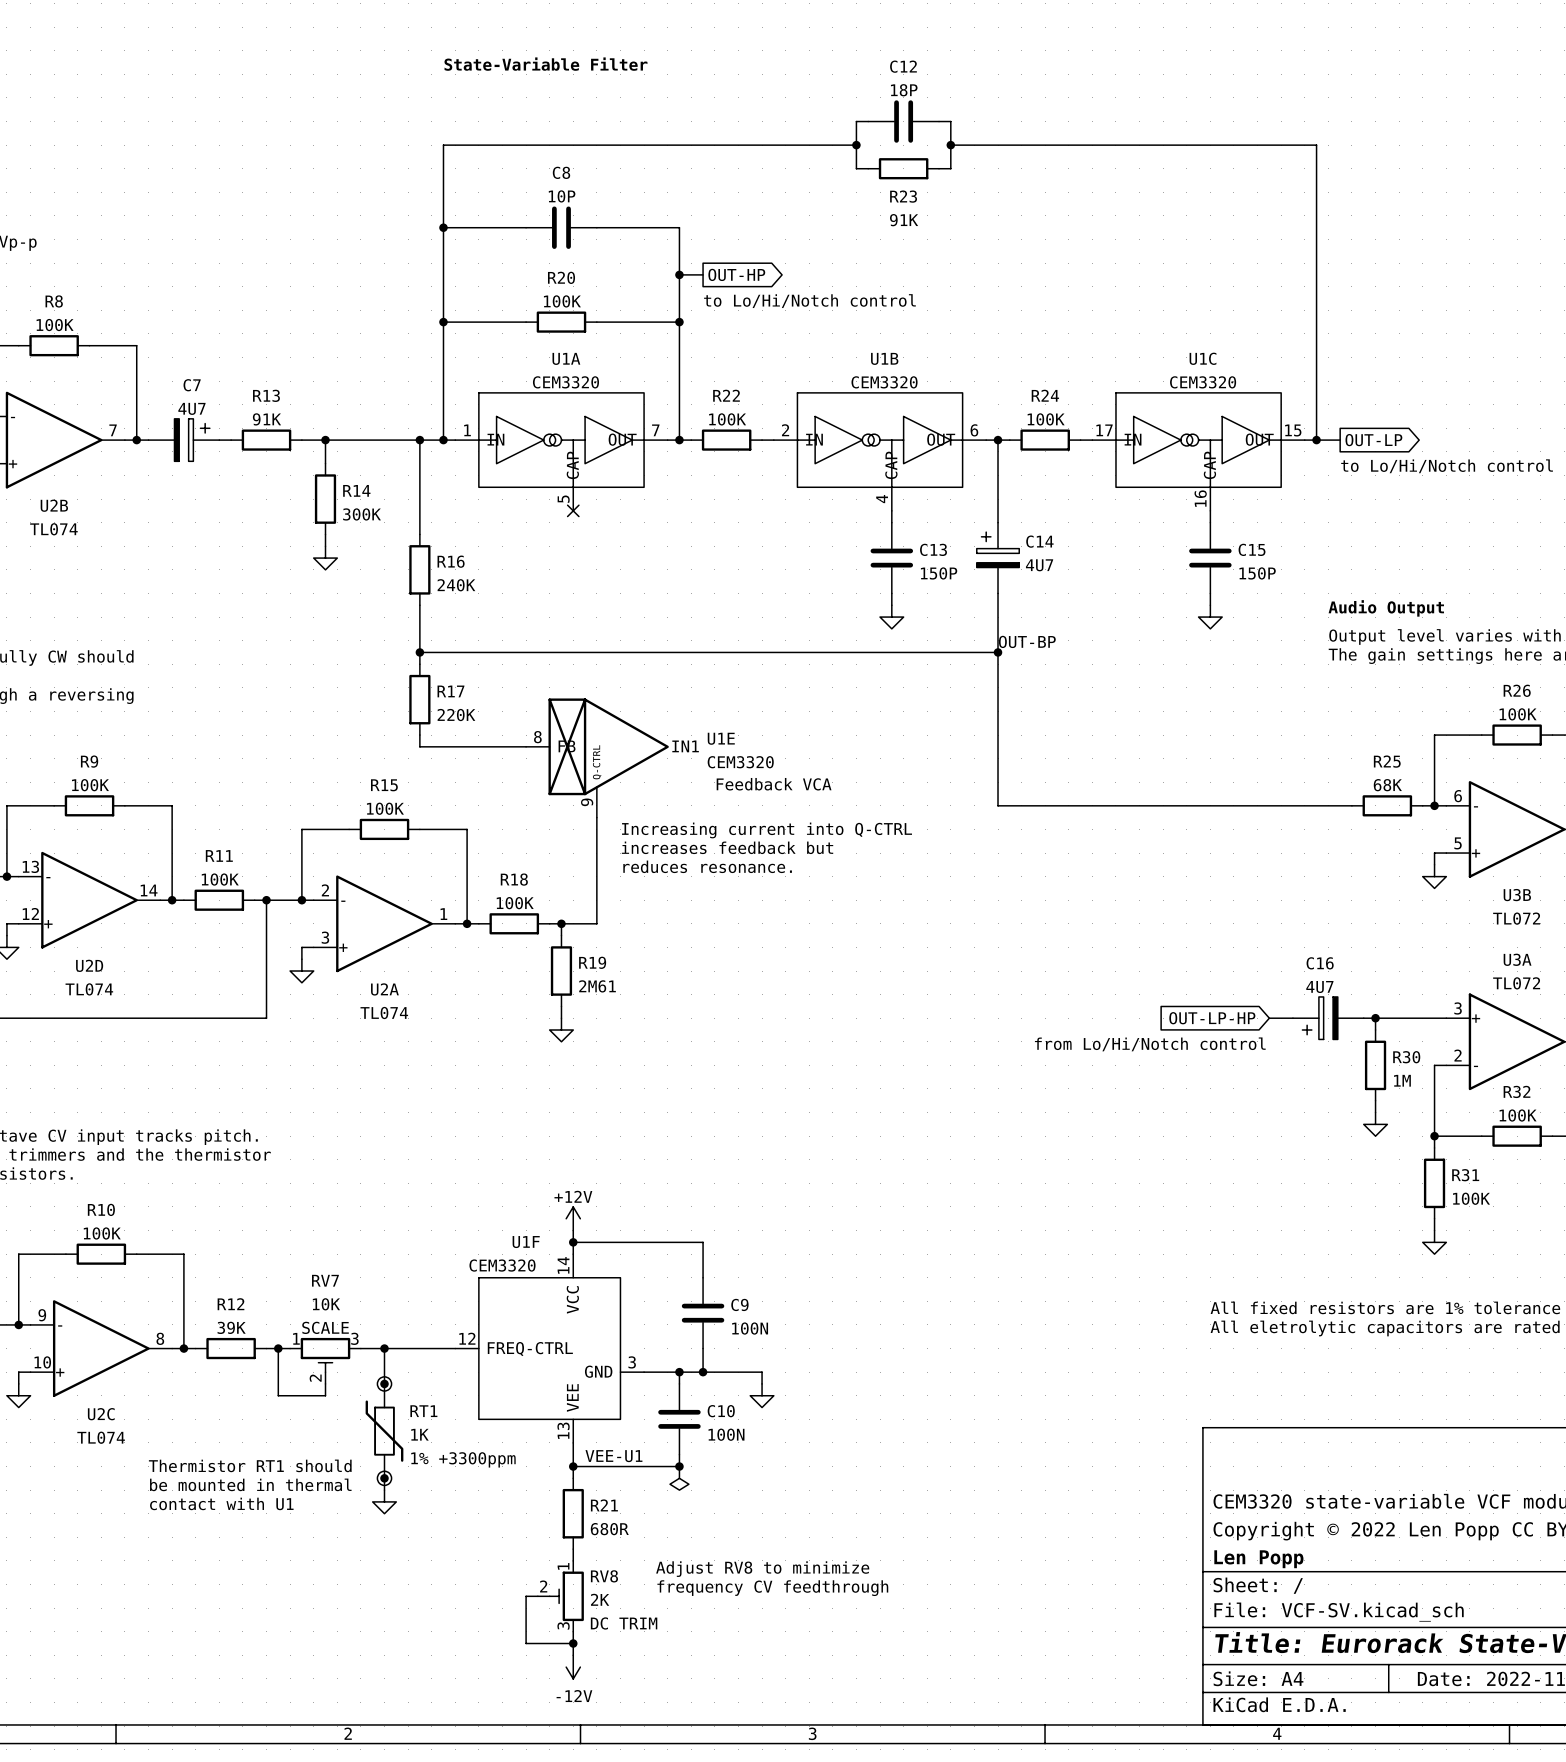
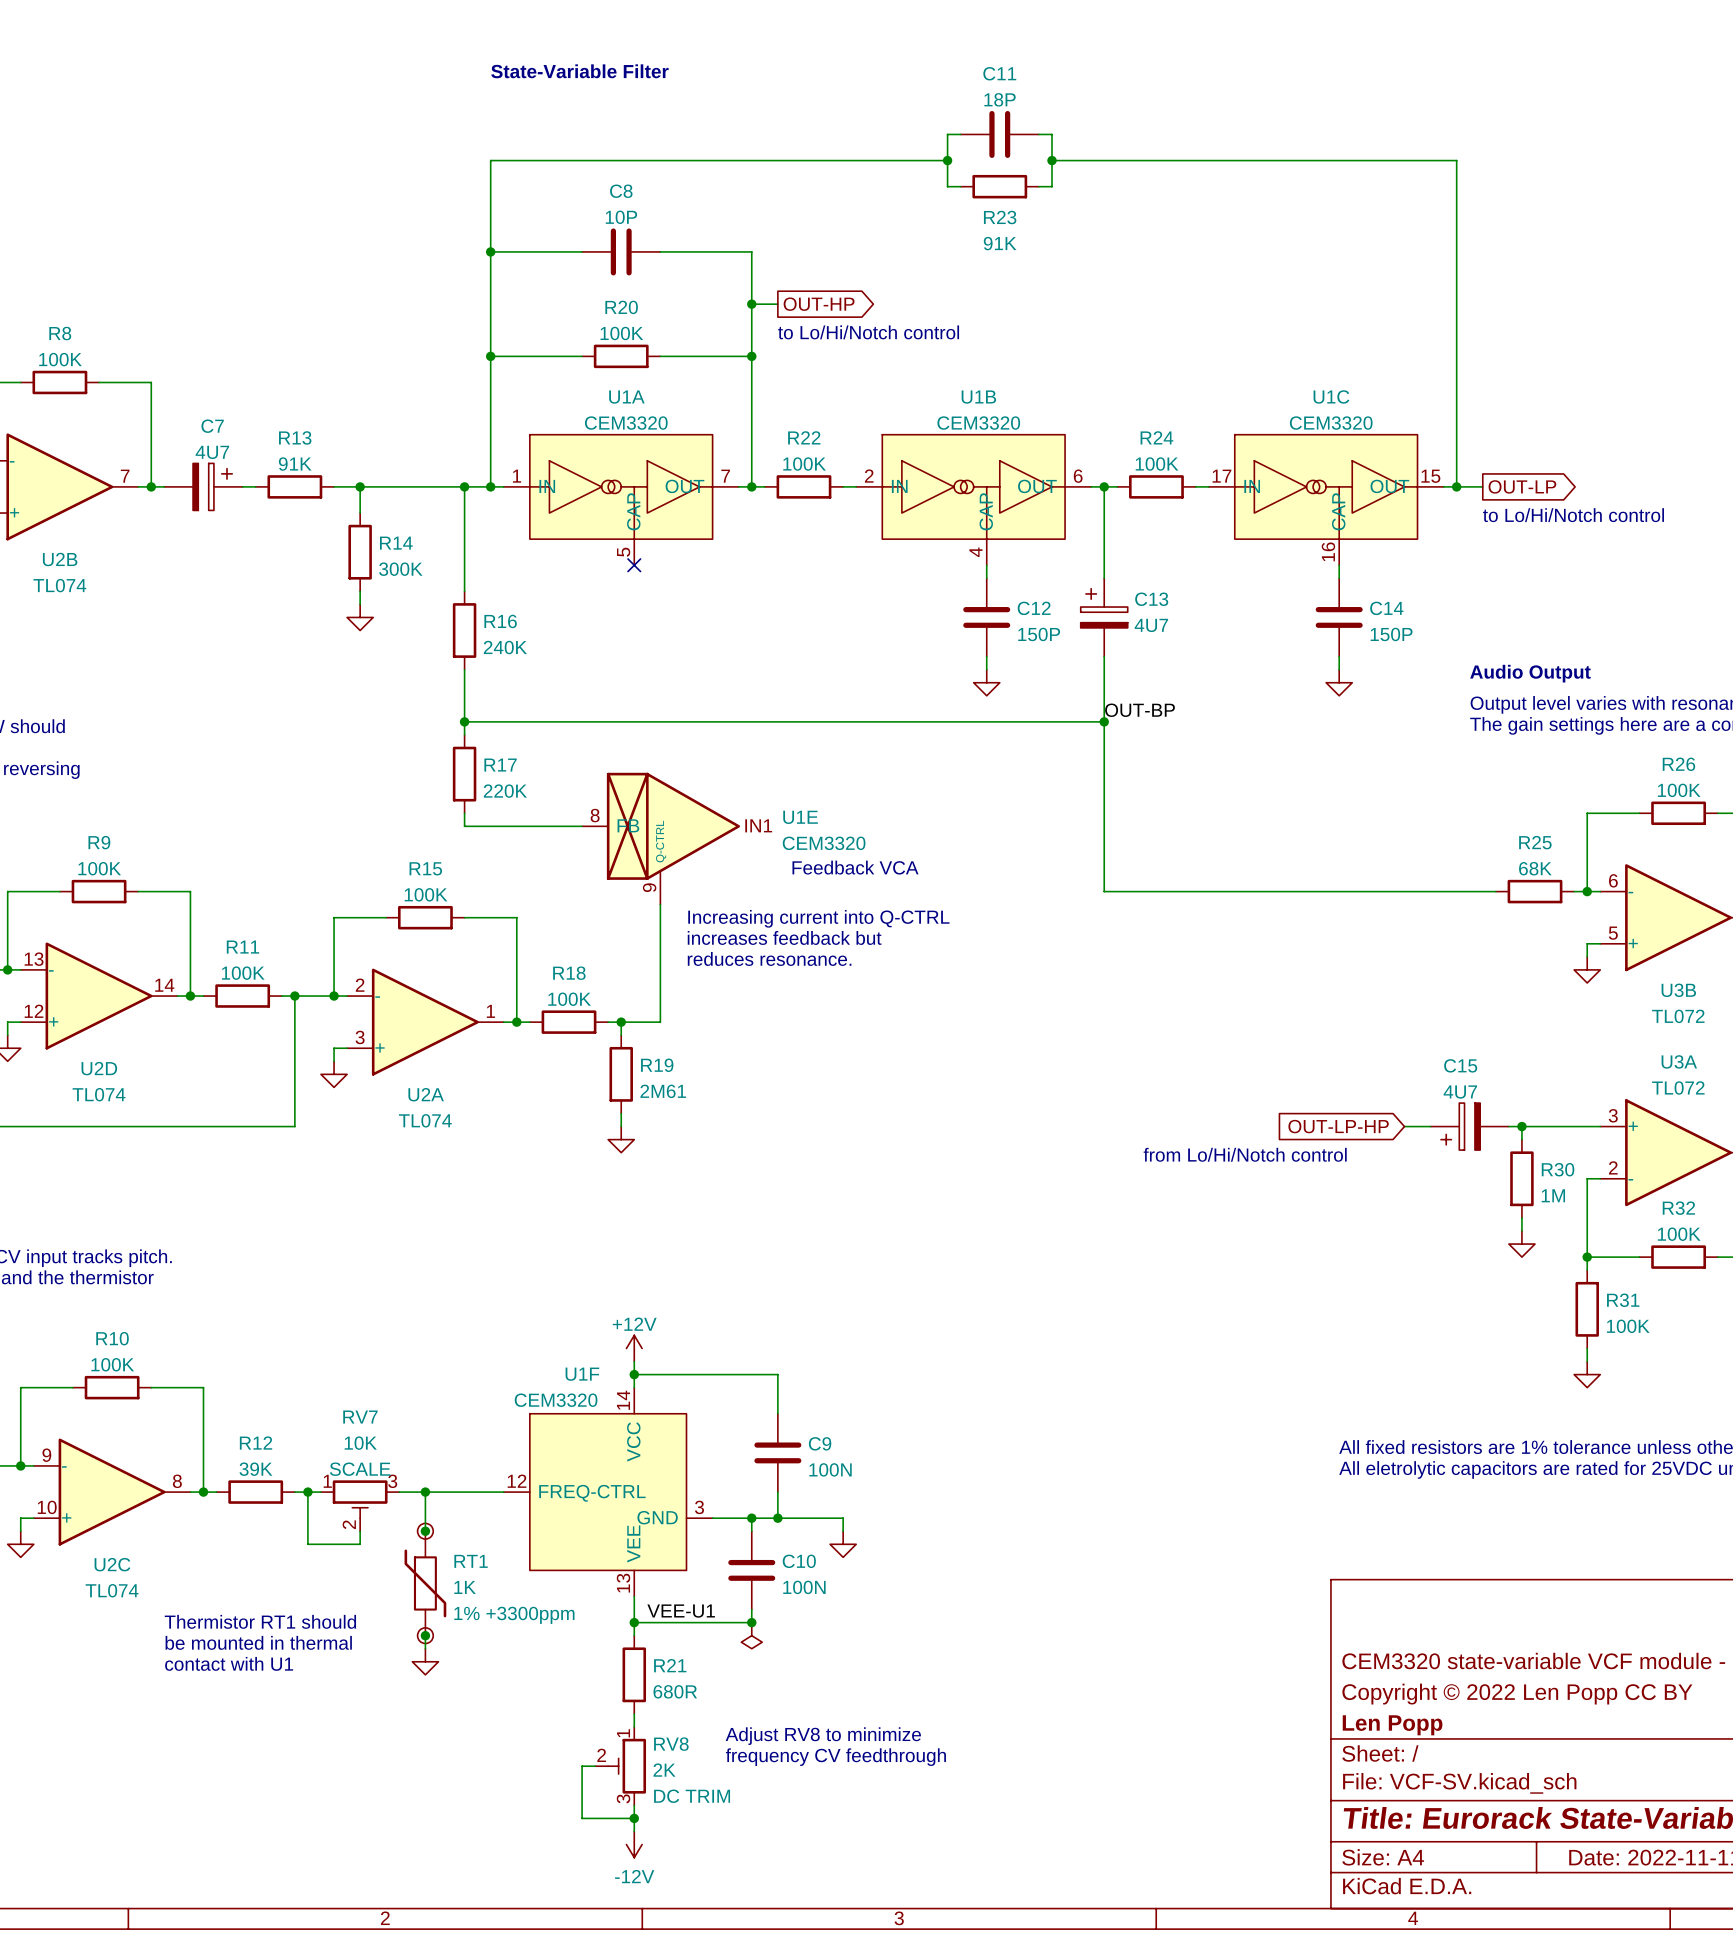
C12 name: C12 (903, 66) -> C11 (999, 73)
C14 name: C14 (1039, 541) -> C13 (1151, 599)
C13 name: C13 (933, 549) -> C12 (1034, 608)
C15 name: C15 (1252, 549) -> C14 (1386, 608)
C16 name: C16 (1320, 963) -> C15 (1460, 1065)

